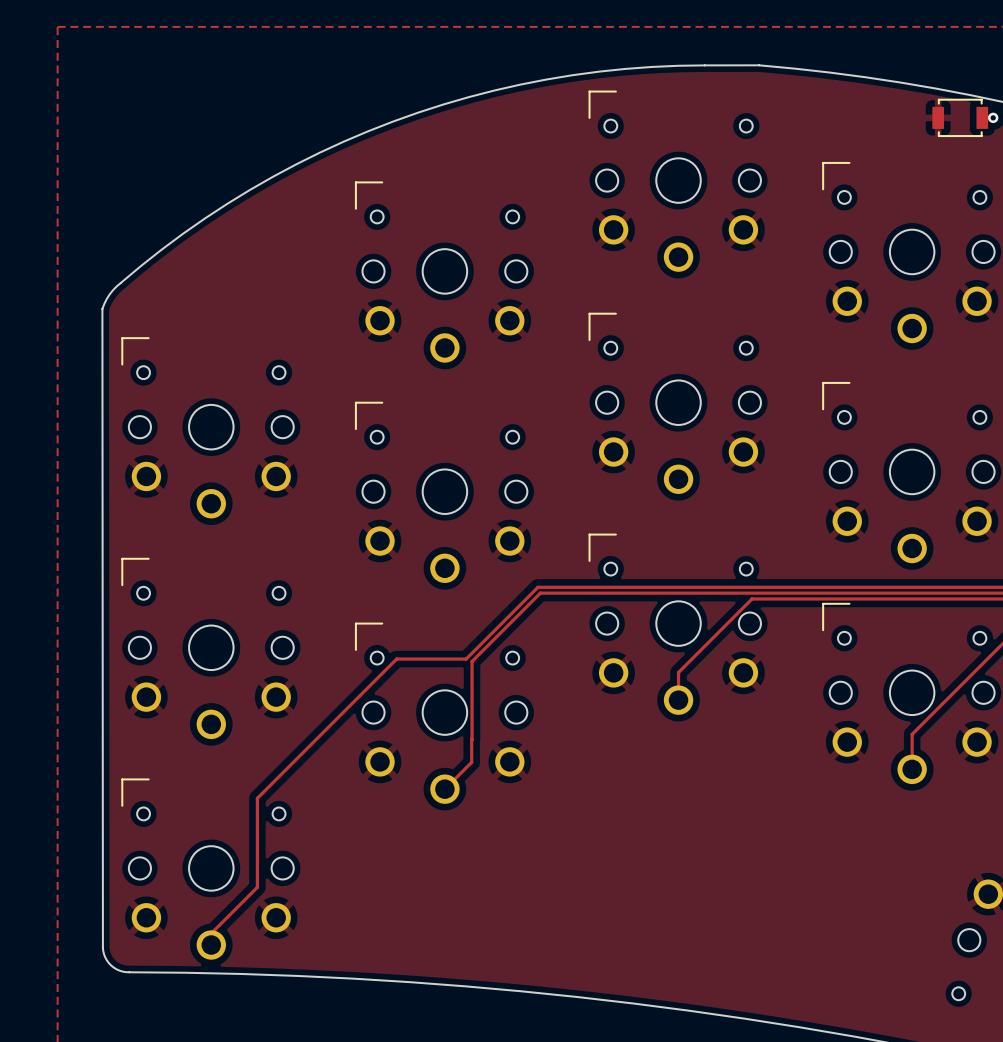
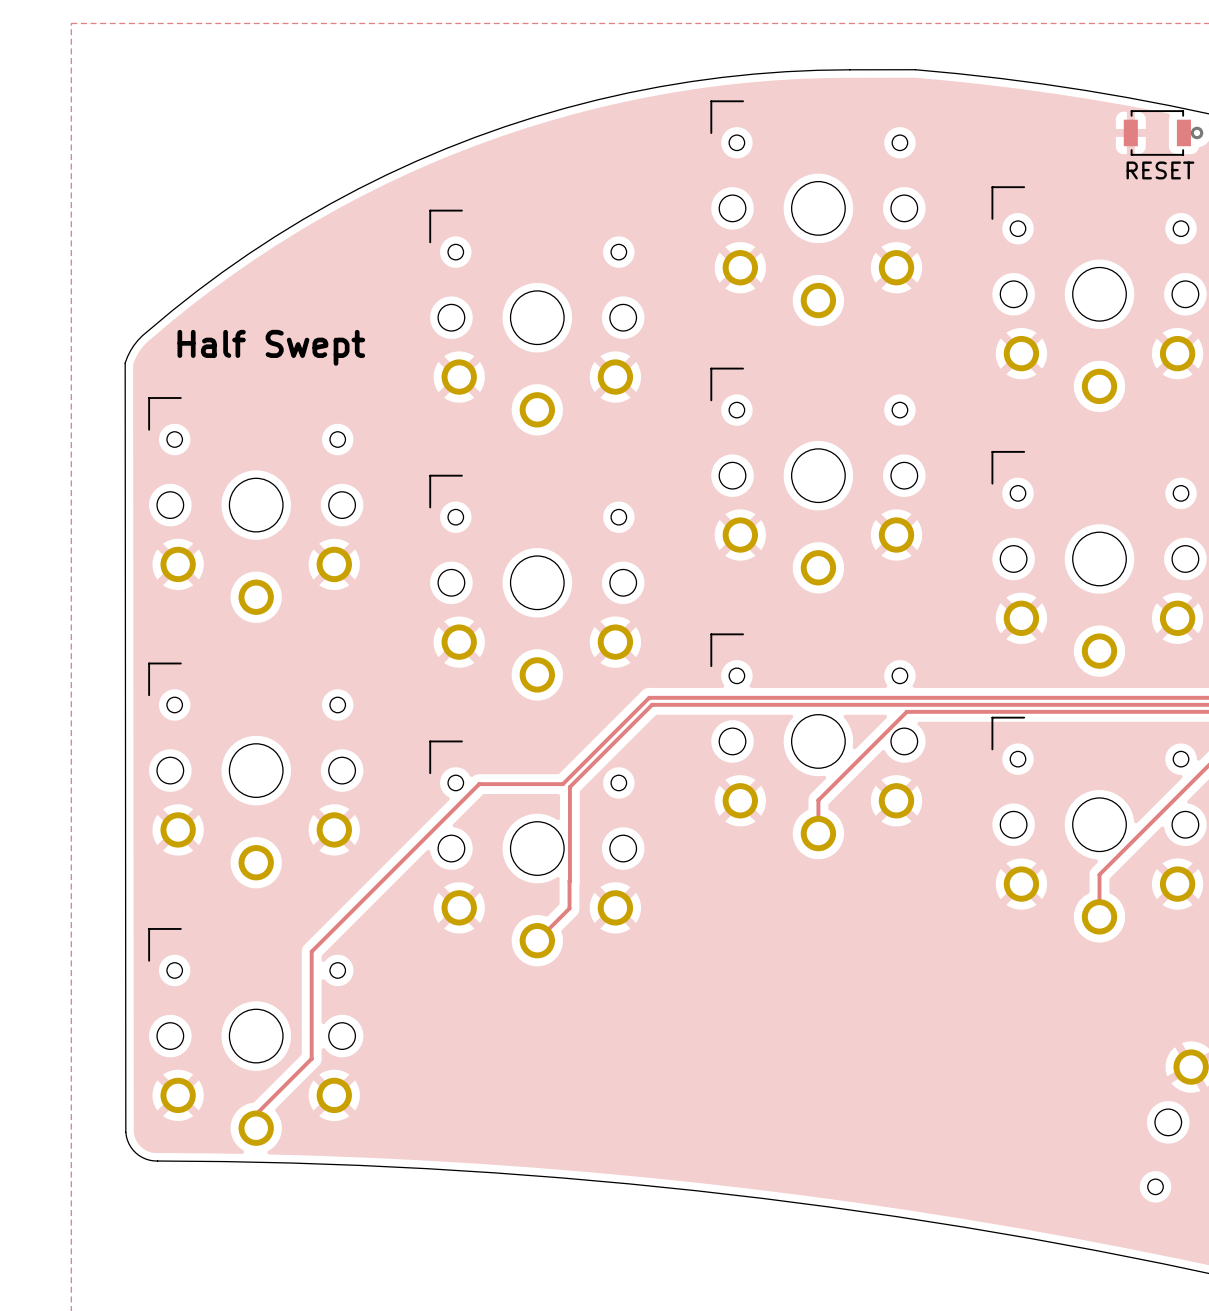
part text: none -> RESET (1160, 170)
text: none -> Half Swept (271, 347)

